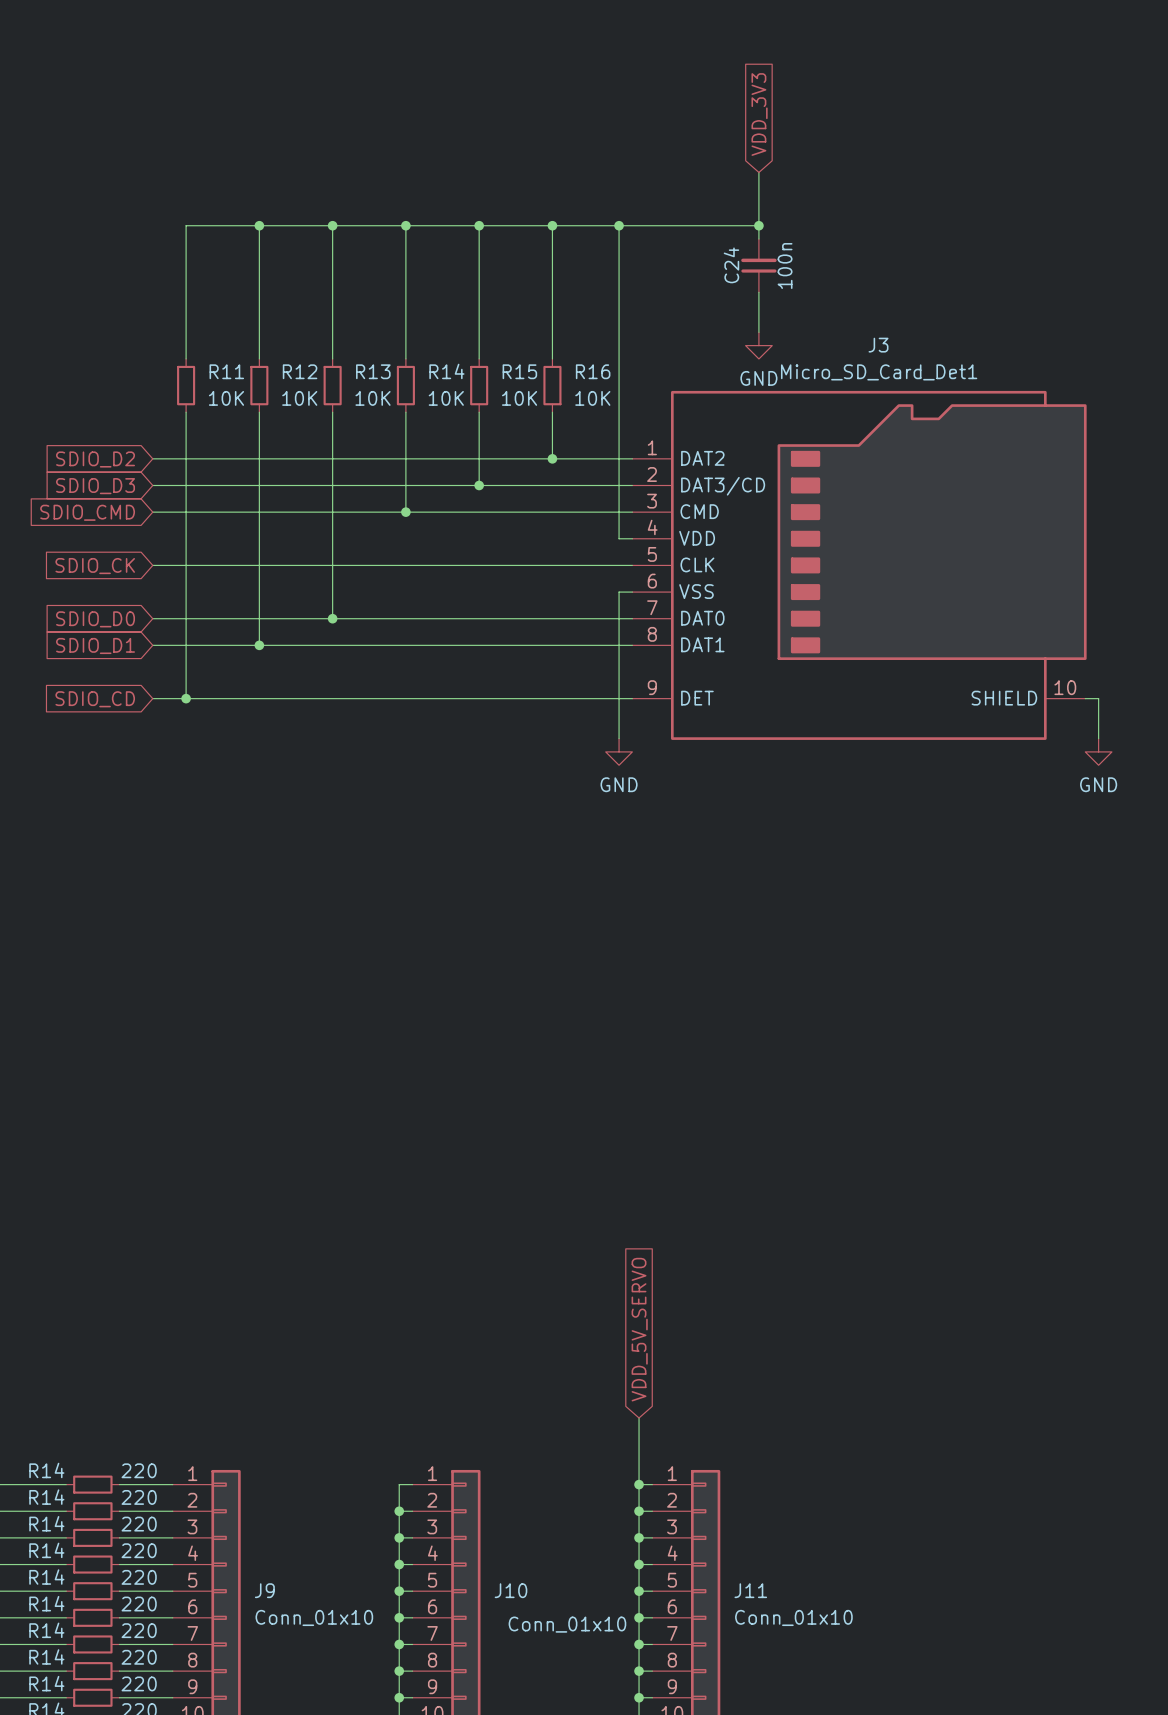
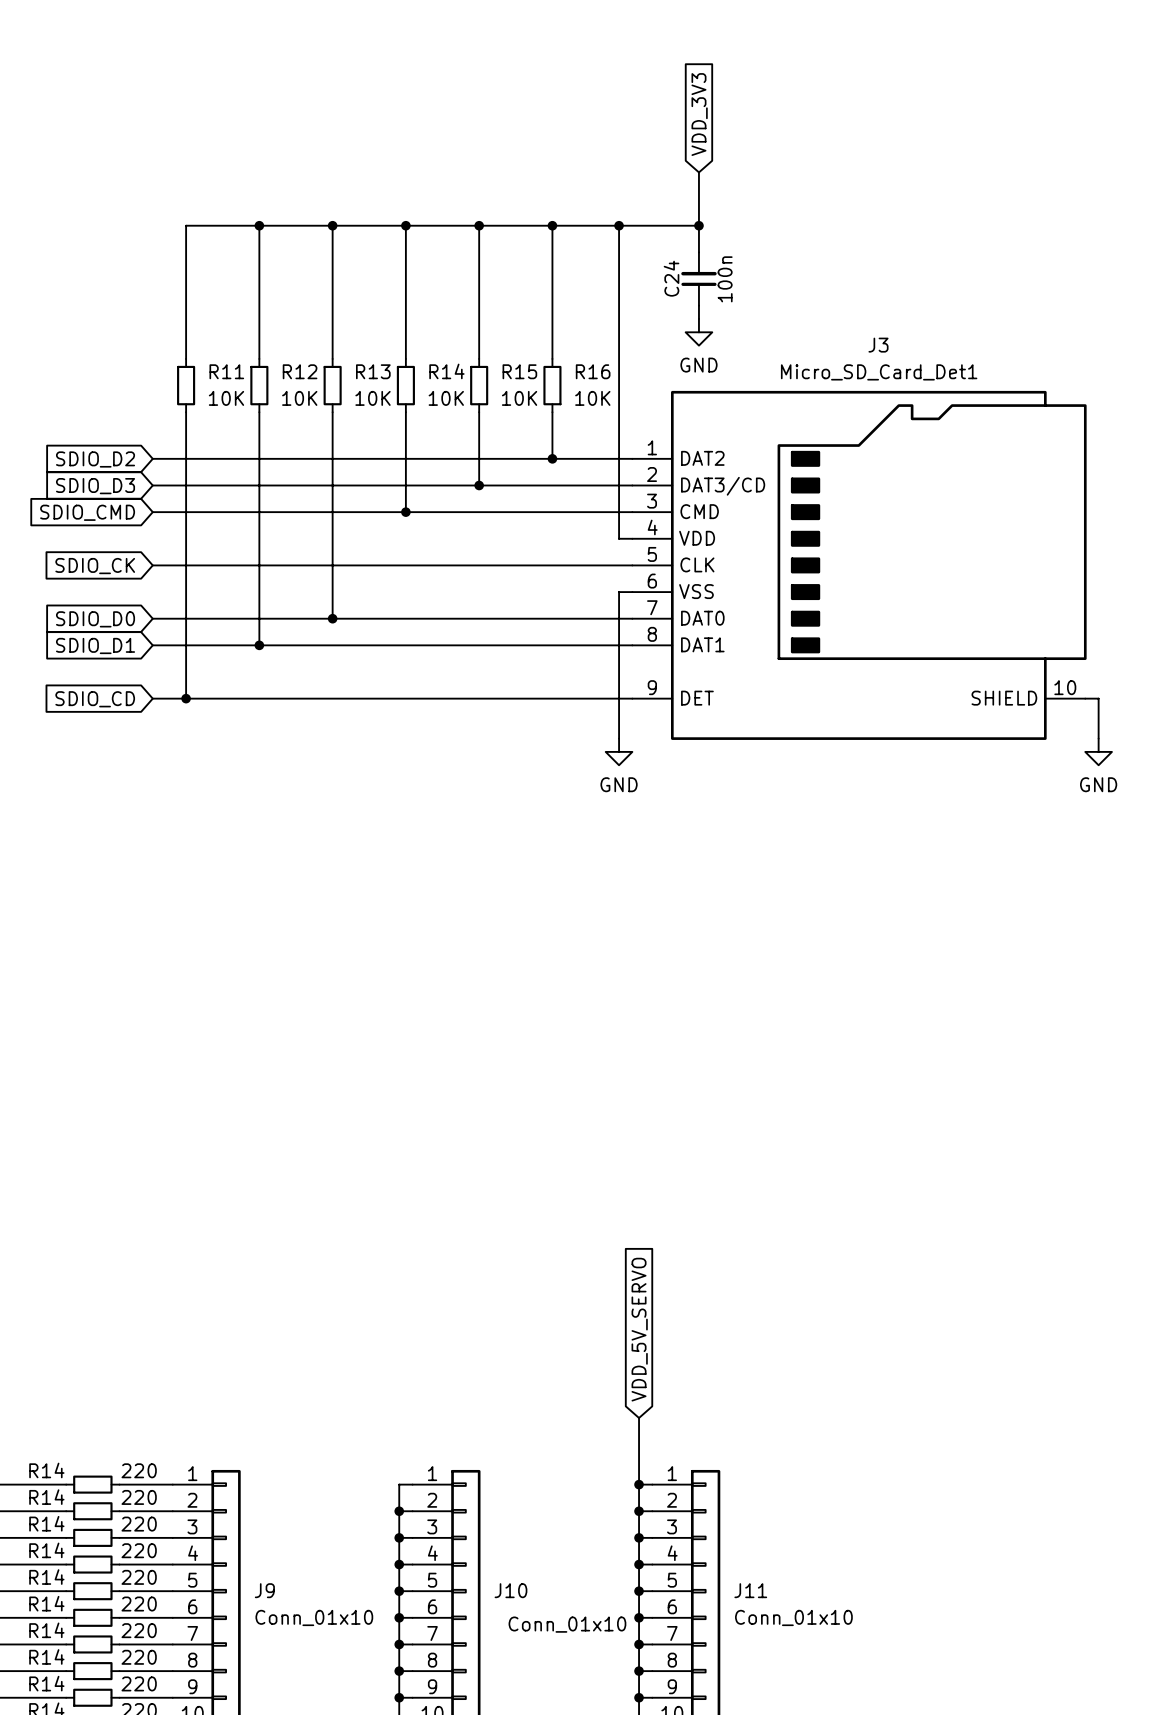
global label position: VDD_3V3 (759, 114) -> VDD_3V3 (699, 114)
wire: none -> (698, 172) (698, 252)
wire: (758, 172) (758, 239) -> none
wire: (698, 225) (758, 225) -> none
junction position: (758, 225) -> (698, 225)
C24 position: (758, 265) -> (698, 279)
wire: (758, 292) (758, 332) -> none
wire: none -> (698, 305) (698, 318)
power symbol position: GND (758, 345) -> GND (698, 332)

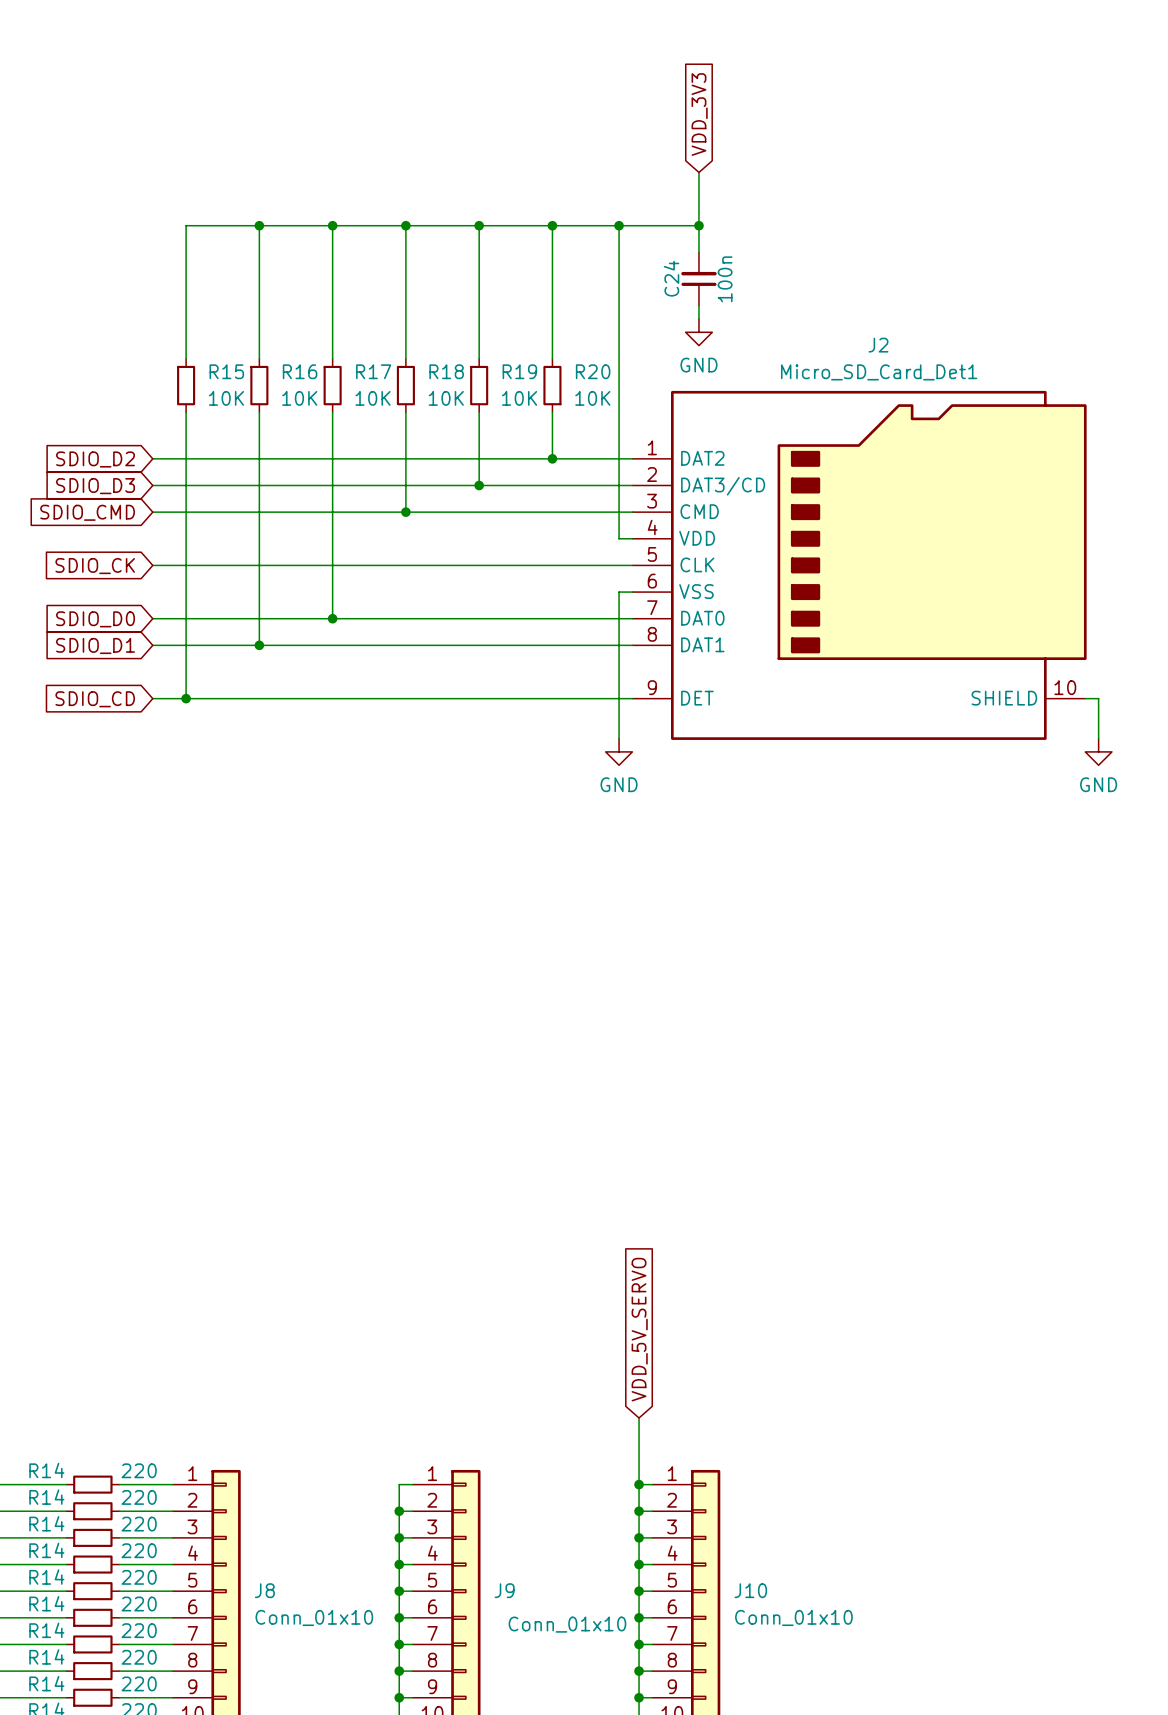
J3 name: J3 (878, 345) -> J2 (878, 345)
R11 name: R11 (226, 371) -> R15 (226, 371)
R12 name: R12 (300, 371) -> R16 (300, 371)
R13 name: R13 (373, 371) -> R17 (373, 371)
R14 name: R14 (446, 371) -> R18 (446, 371)
R15 name: R15 (519, 371) -> R19 (519, 371)
R16 name: R16 (593, 371) -> R20 (593, 371)
J9 name: J9 (264, 1590) -> J8 (264, 1590)
J10 name: J10 (510, 1590) -> J9 (504, 1590)
J11 name: J11 (750, 1590) -> J10 (750, 1590)

